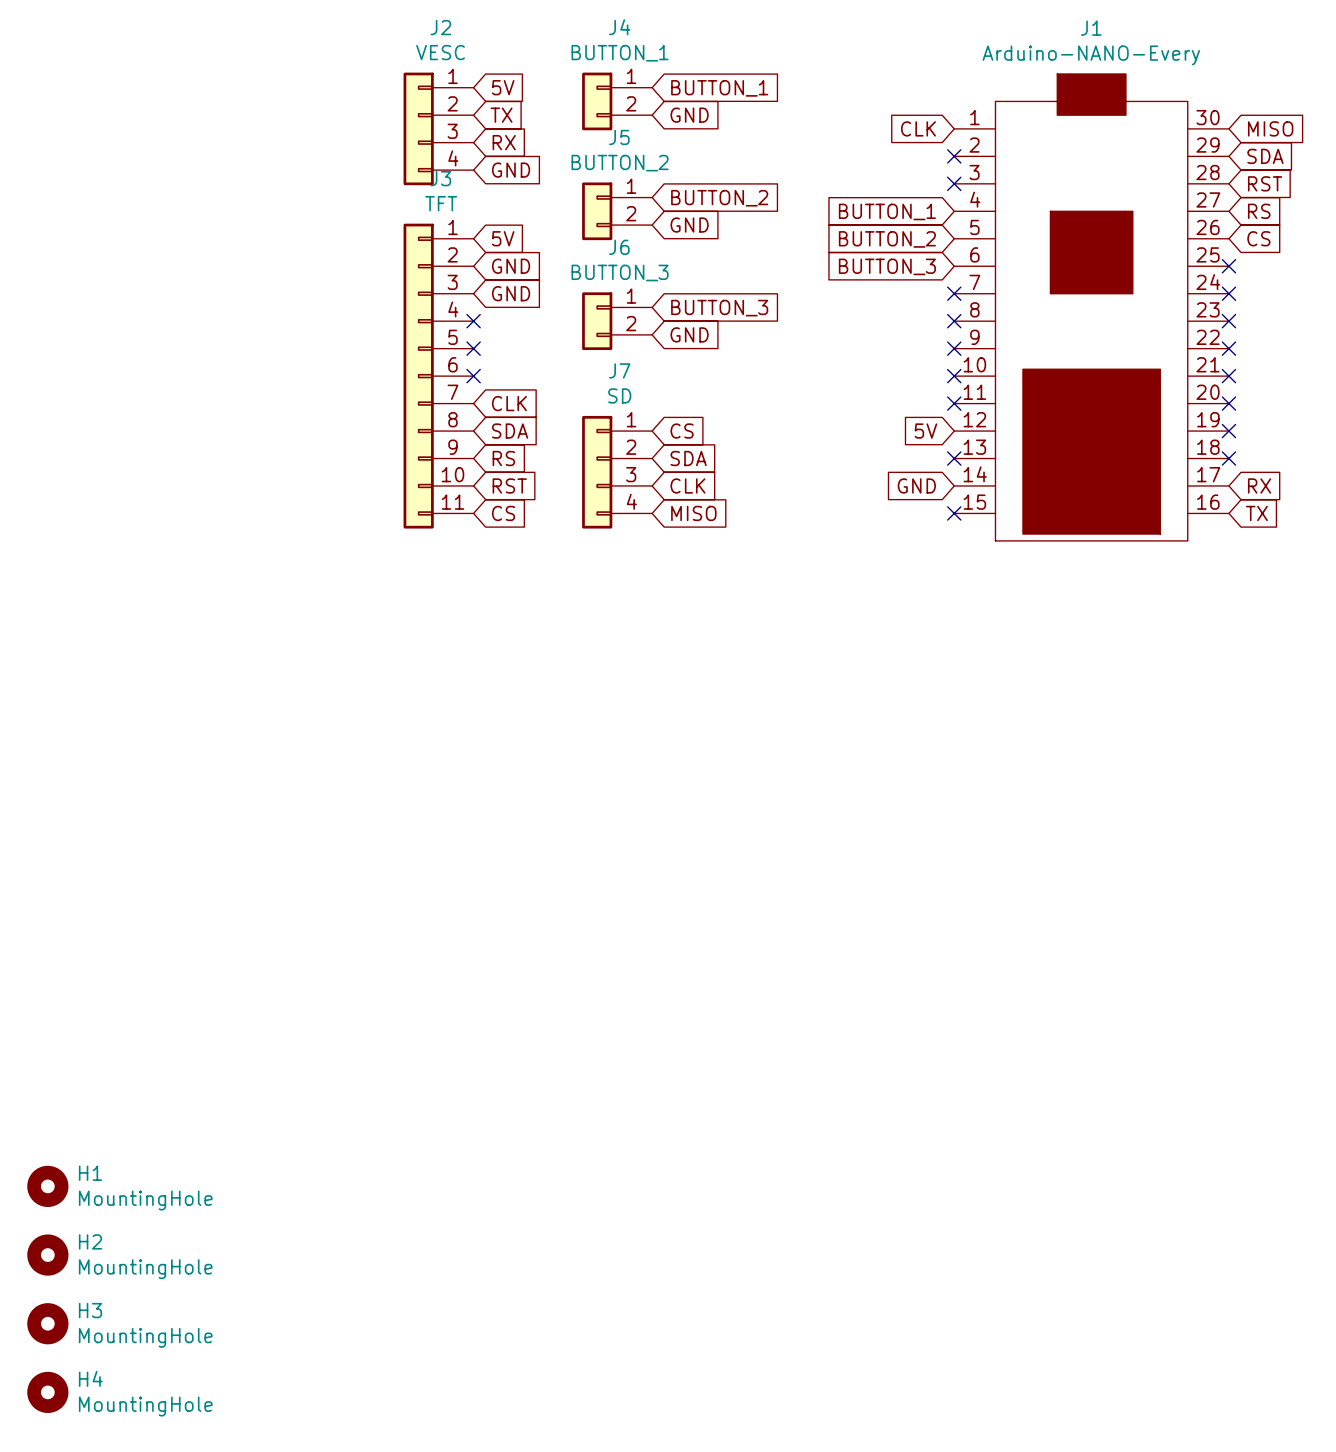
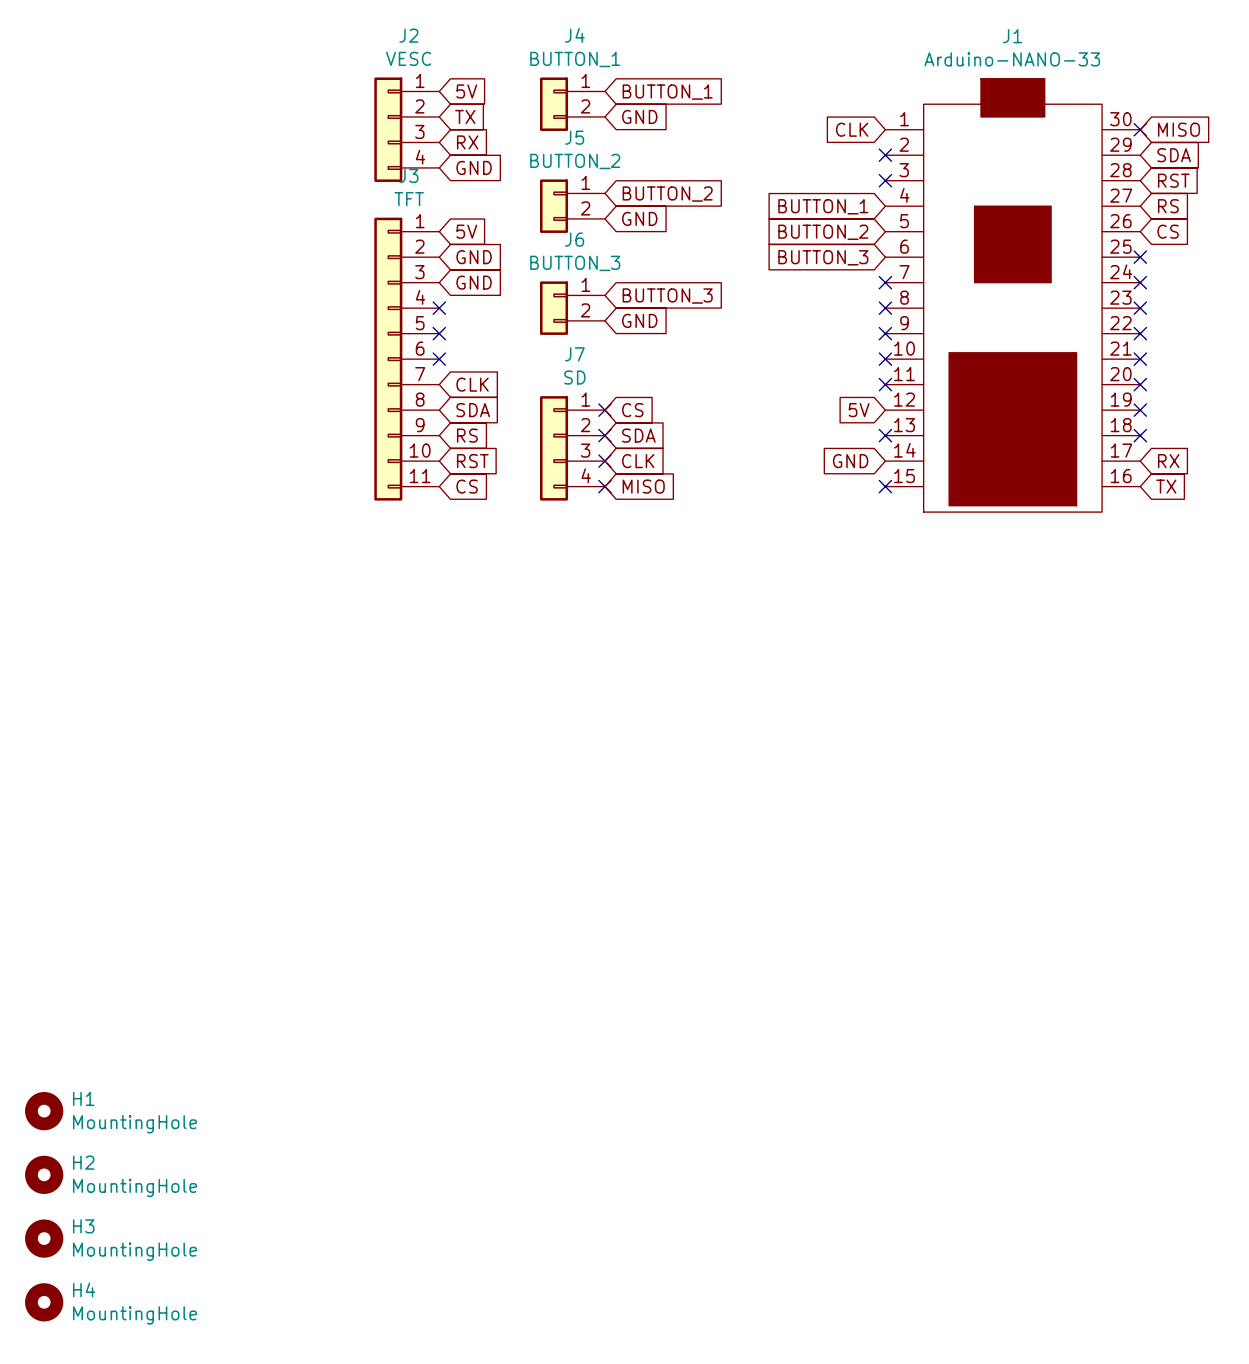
J1 value: Arduino-NANO-Every (1091, 55) -> Arduino-NANO-33 (1012, 59)
no-connect mark: none -> (1140, 129)
no-connect mark: none -> (604, 410)
no-connect mark: none -> (604, 435)
no-connect mark: none -> (604, 461)
no-connect mark: none -> (604, 486)

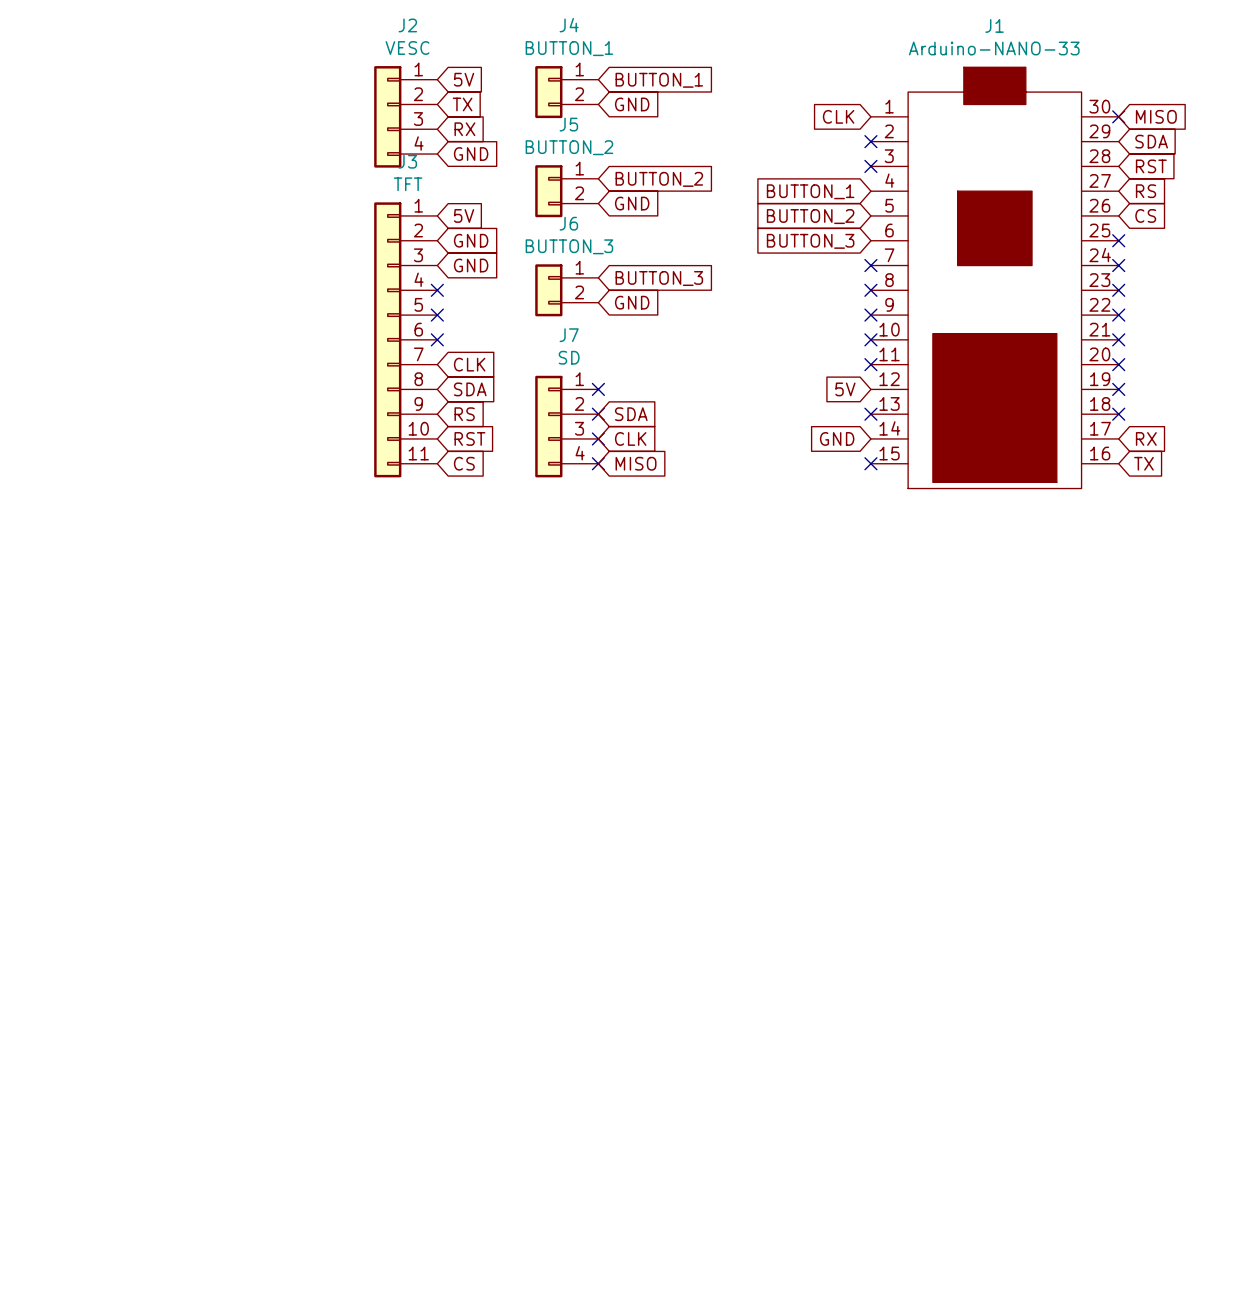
global label: CS (632, 410) -> none
H1: MountingHole (44, 1111) -> none
H2: MountingHole (44, 1174) -> none
H3: MountingHole (44, 1238) -> none
H4: MountingHole (44, 1302) -> none

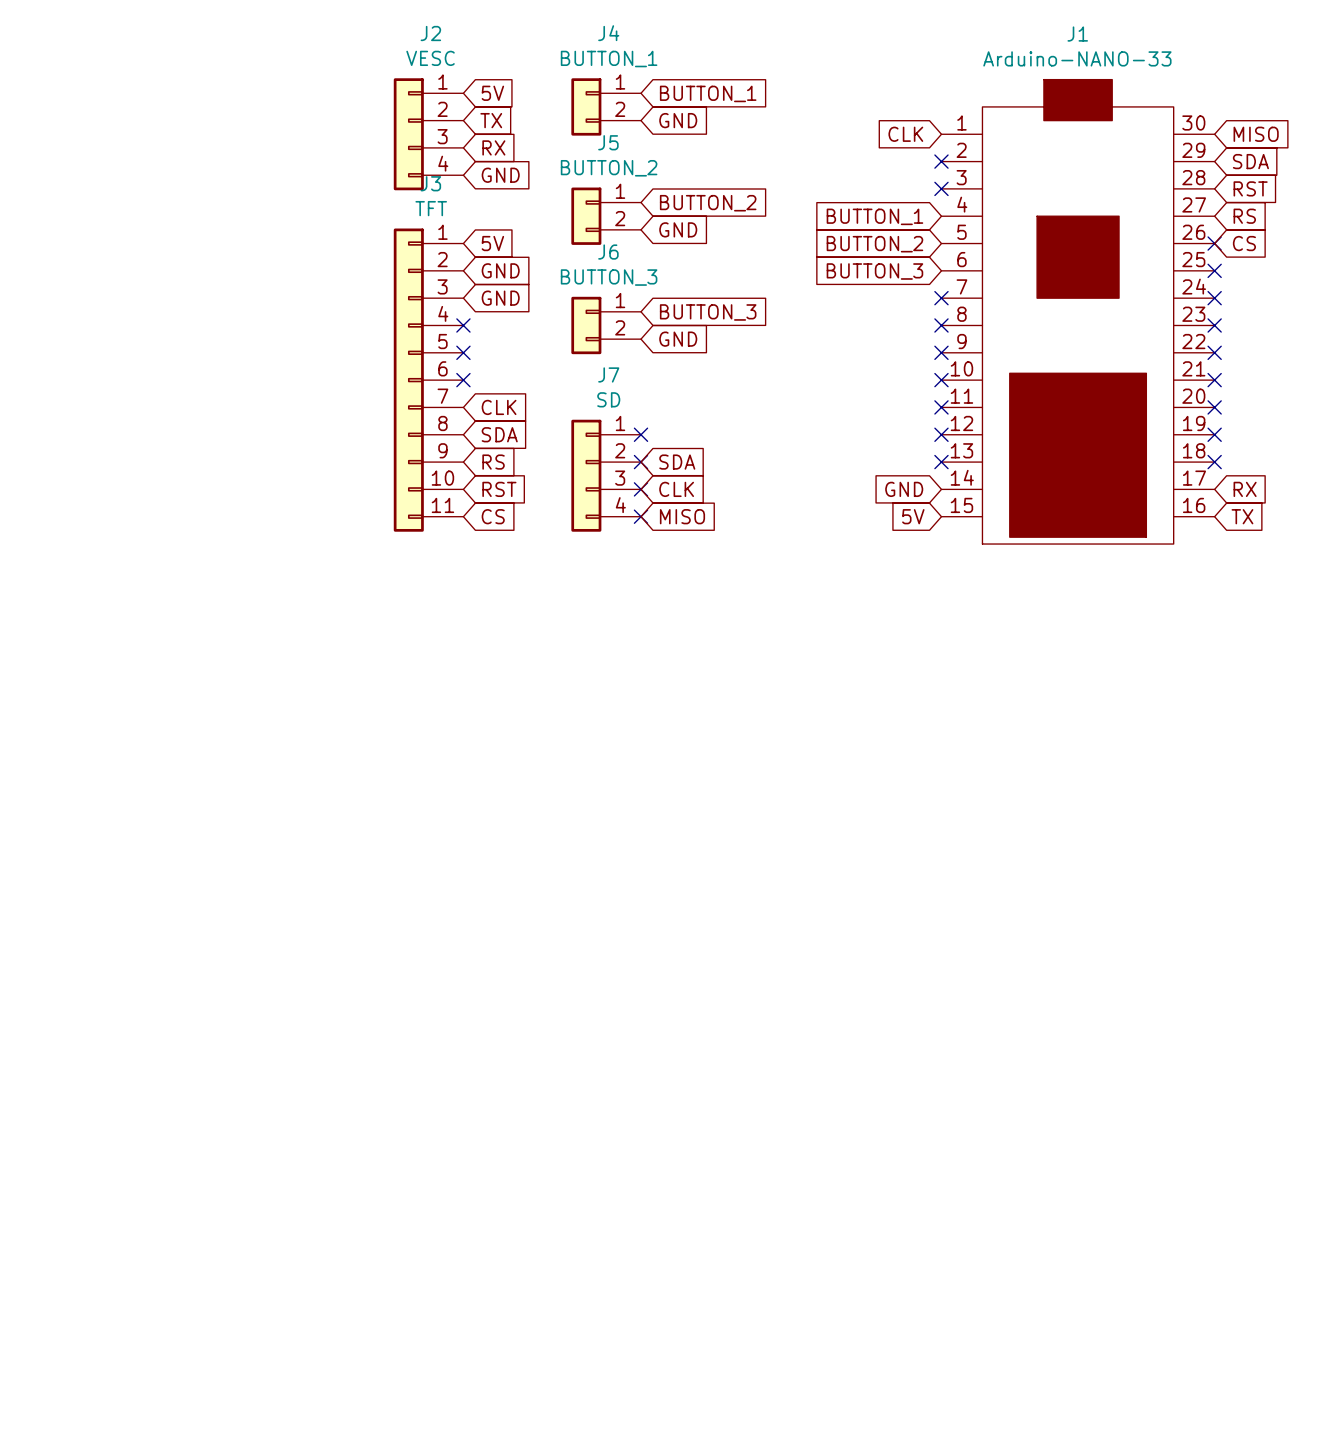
no-connect mark: (1118, 116) -> none
no-connect mark: none -> (1214, 243)
global label position: 5V (845, 389) -> 5V (913, 516)
no-connect mark: none -> (941, 434)
no-connect mark: (870, 463) -> none

